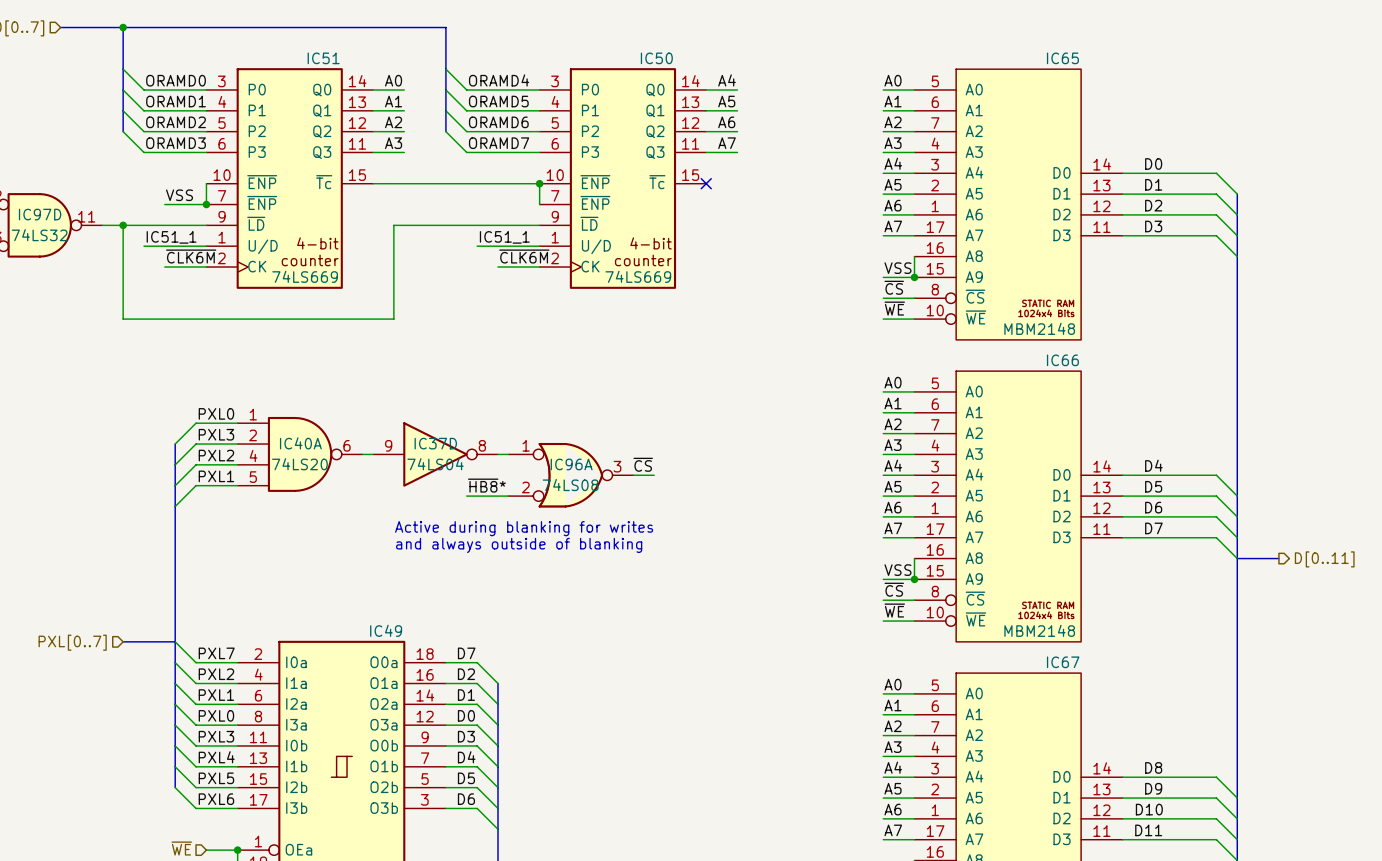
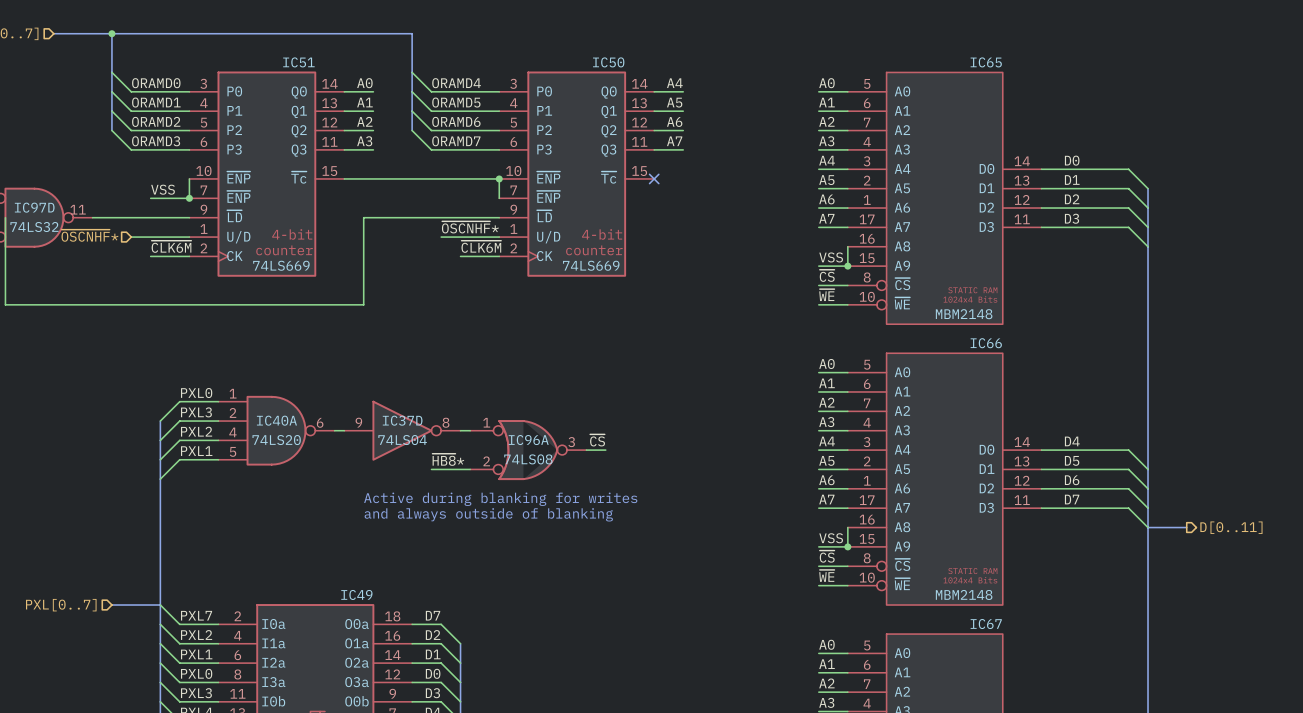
wire: (123, 225) (123, 319) -> (5, 217) (5, 304) (111, 304)
junction: (123, 225) -> none
label: IC51_1 (171, 237) -> none
label: IC51_1 (504, 237) -> ~{OSCNHF}* (470, 227)
hierarchical label: none -> ~{OSCNHF}* (89, 235)

